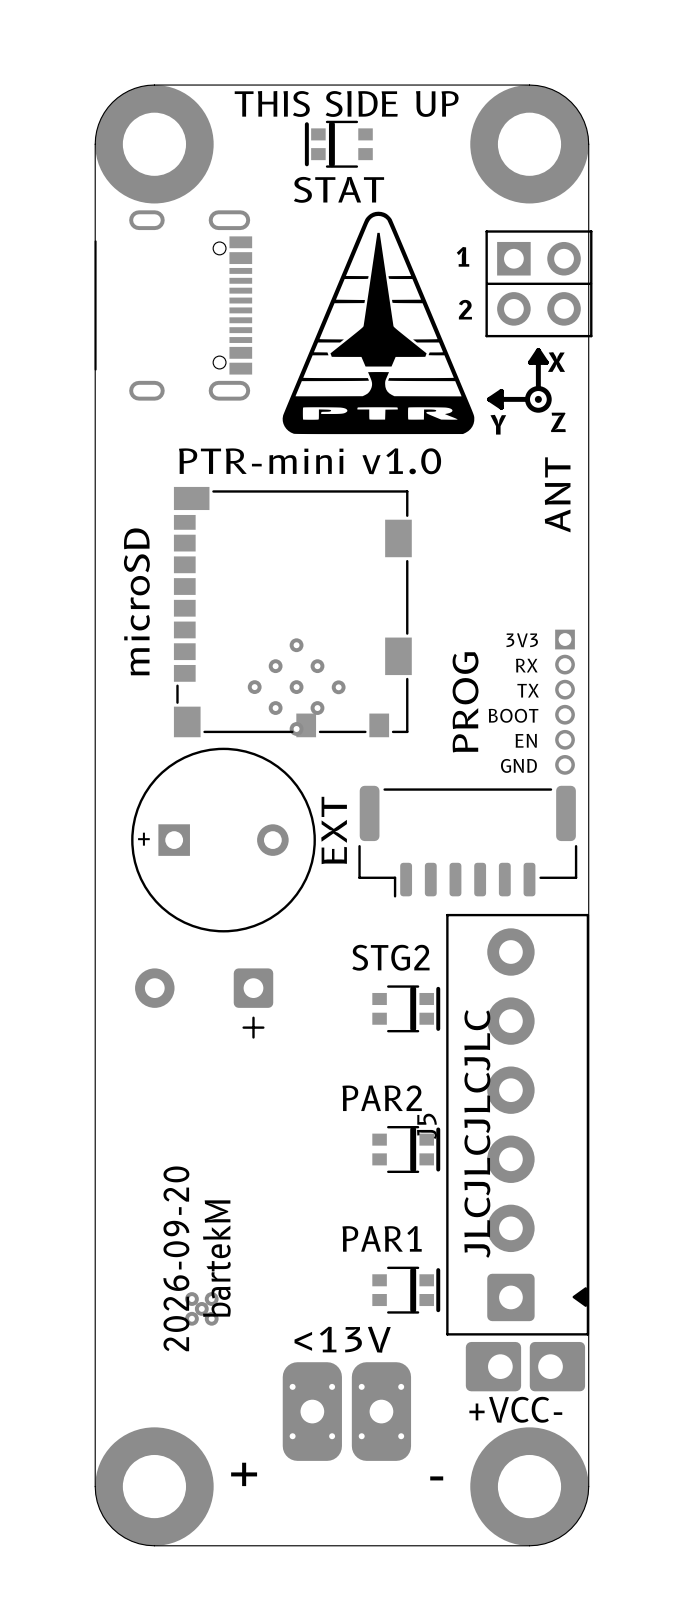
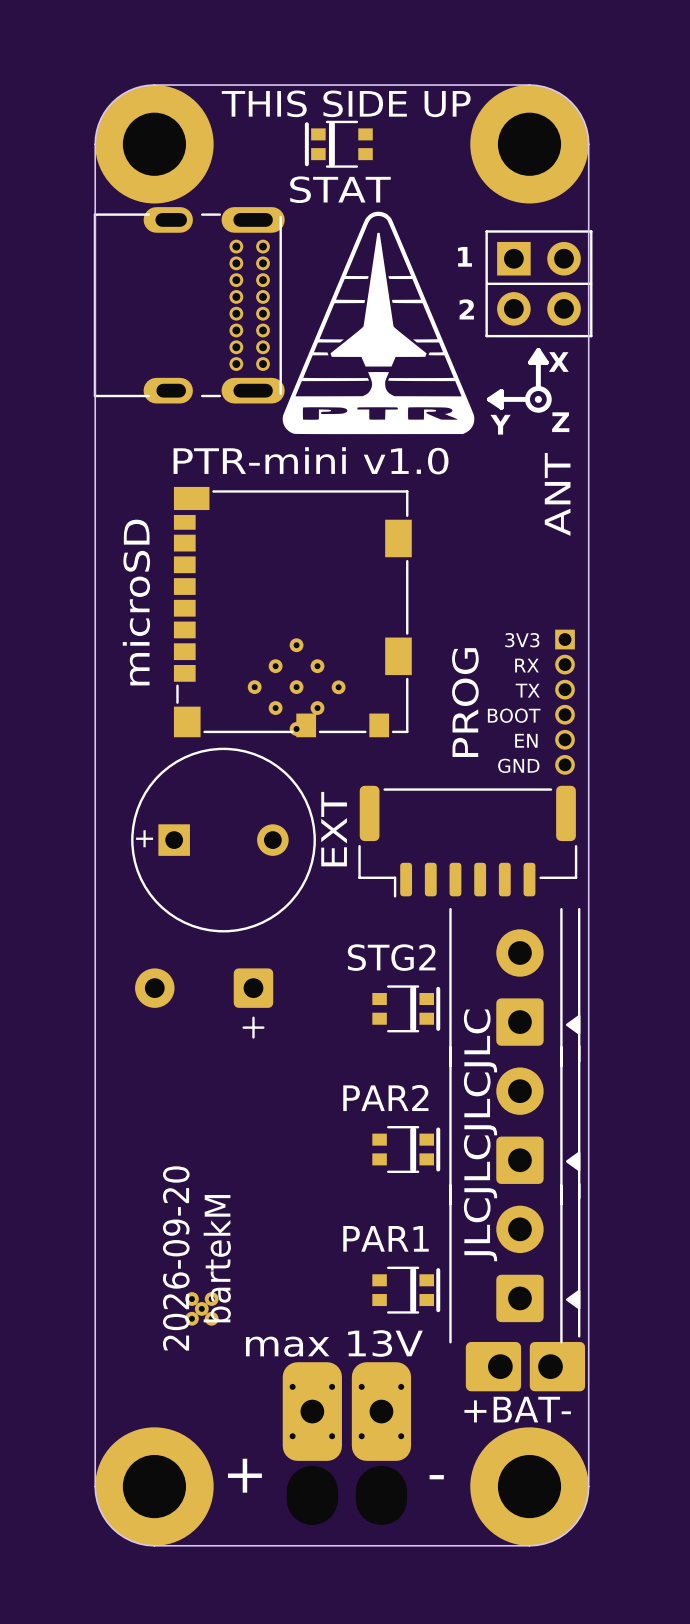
part footprint: [94, 210, 253, 401] -> [93, 207, 285, 404]
part: none -> (514, 987)
part: none -> (514, 1124)
J5: (517, 1124) -> none
part: none -> (514, 1263)
text: <13V (342, 1339) -> none
text: none -> max 13V (334, 1343)
text: +VCC- (515, 1409) -> +BAT- (517, 1409)

